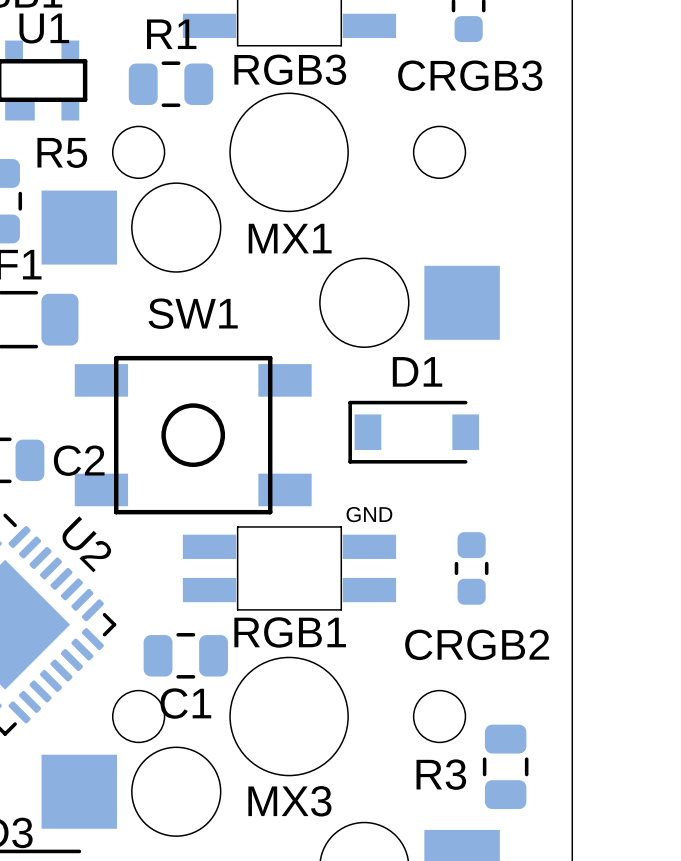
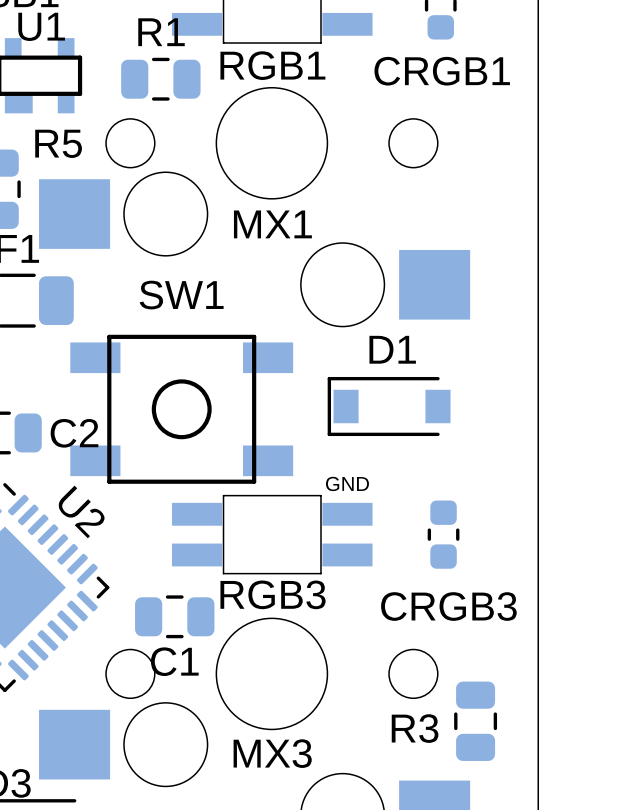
RGB3 name: RGB3 (290, 69) -> RGB1 (272, 65)
CRGB3 name: CRGB3 (470, 75) -> CRGB1 (442, 71)
RGB1 name: RGB1 (290, 632) -> RGB3 (273, 594)
CRGB2 name: CRGB2 (477, 644) -> CRGB3 (448, 606)

